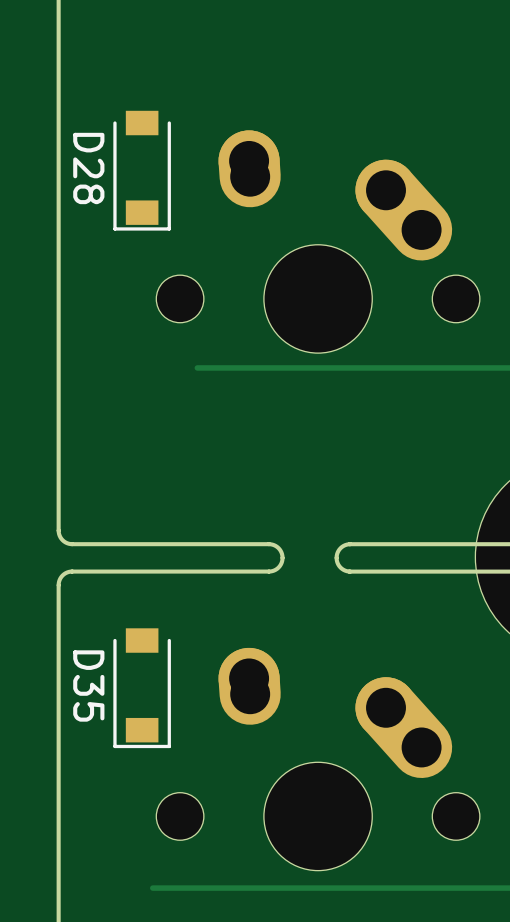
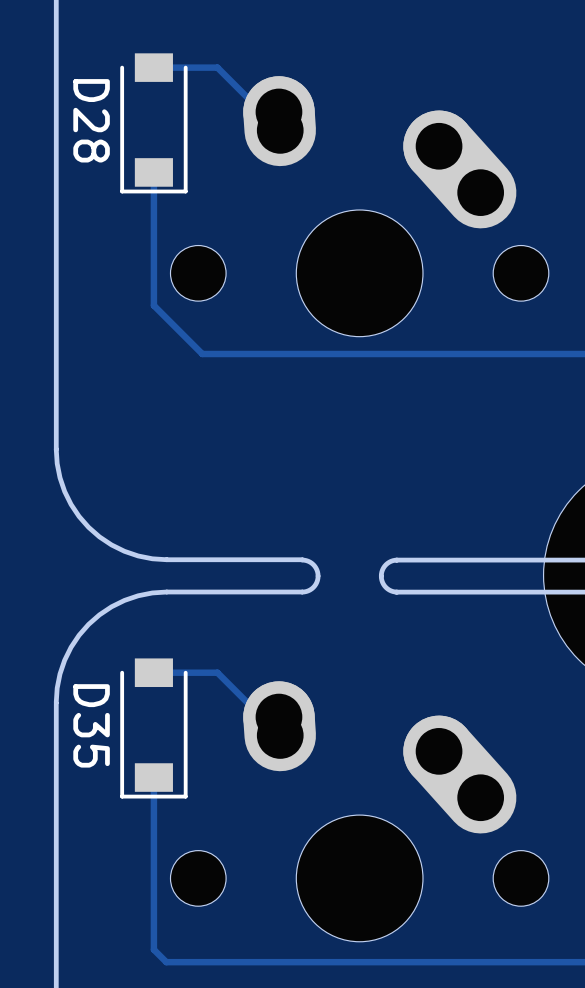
track: none -> (153, 67) (217, 67) (280, 130)
track: none -> (153, 172) (153, 305) (202, 354) (218, 354)
board edge: (58, 449) (58, 532) (63, 541) (72, 544) -> none
board edge: (268, 544) (72, 544) -> (302, 559) (166, 559) (152, 558) (124, 551) (99, 536) (79, 516) (64, 491) (60, 477) (56, 449)
board edge: (72, 571) (62, 575) (58, 585) -> none
board edge: (268, 571) (72, 571) -> (302, 592) (166, 592) (152, 592) (124, 600) (99, 614) (79, 635) (71, 647) (60, 673) (56, 702)
board edge: (58, 585) (58, 666) -> none
track: none -> (153, 672) (217, 672) (280, 735)
track: none -> (153, 777) (153, 949) (166, 962)

